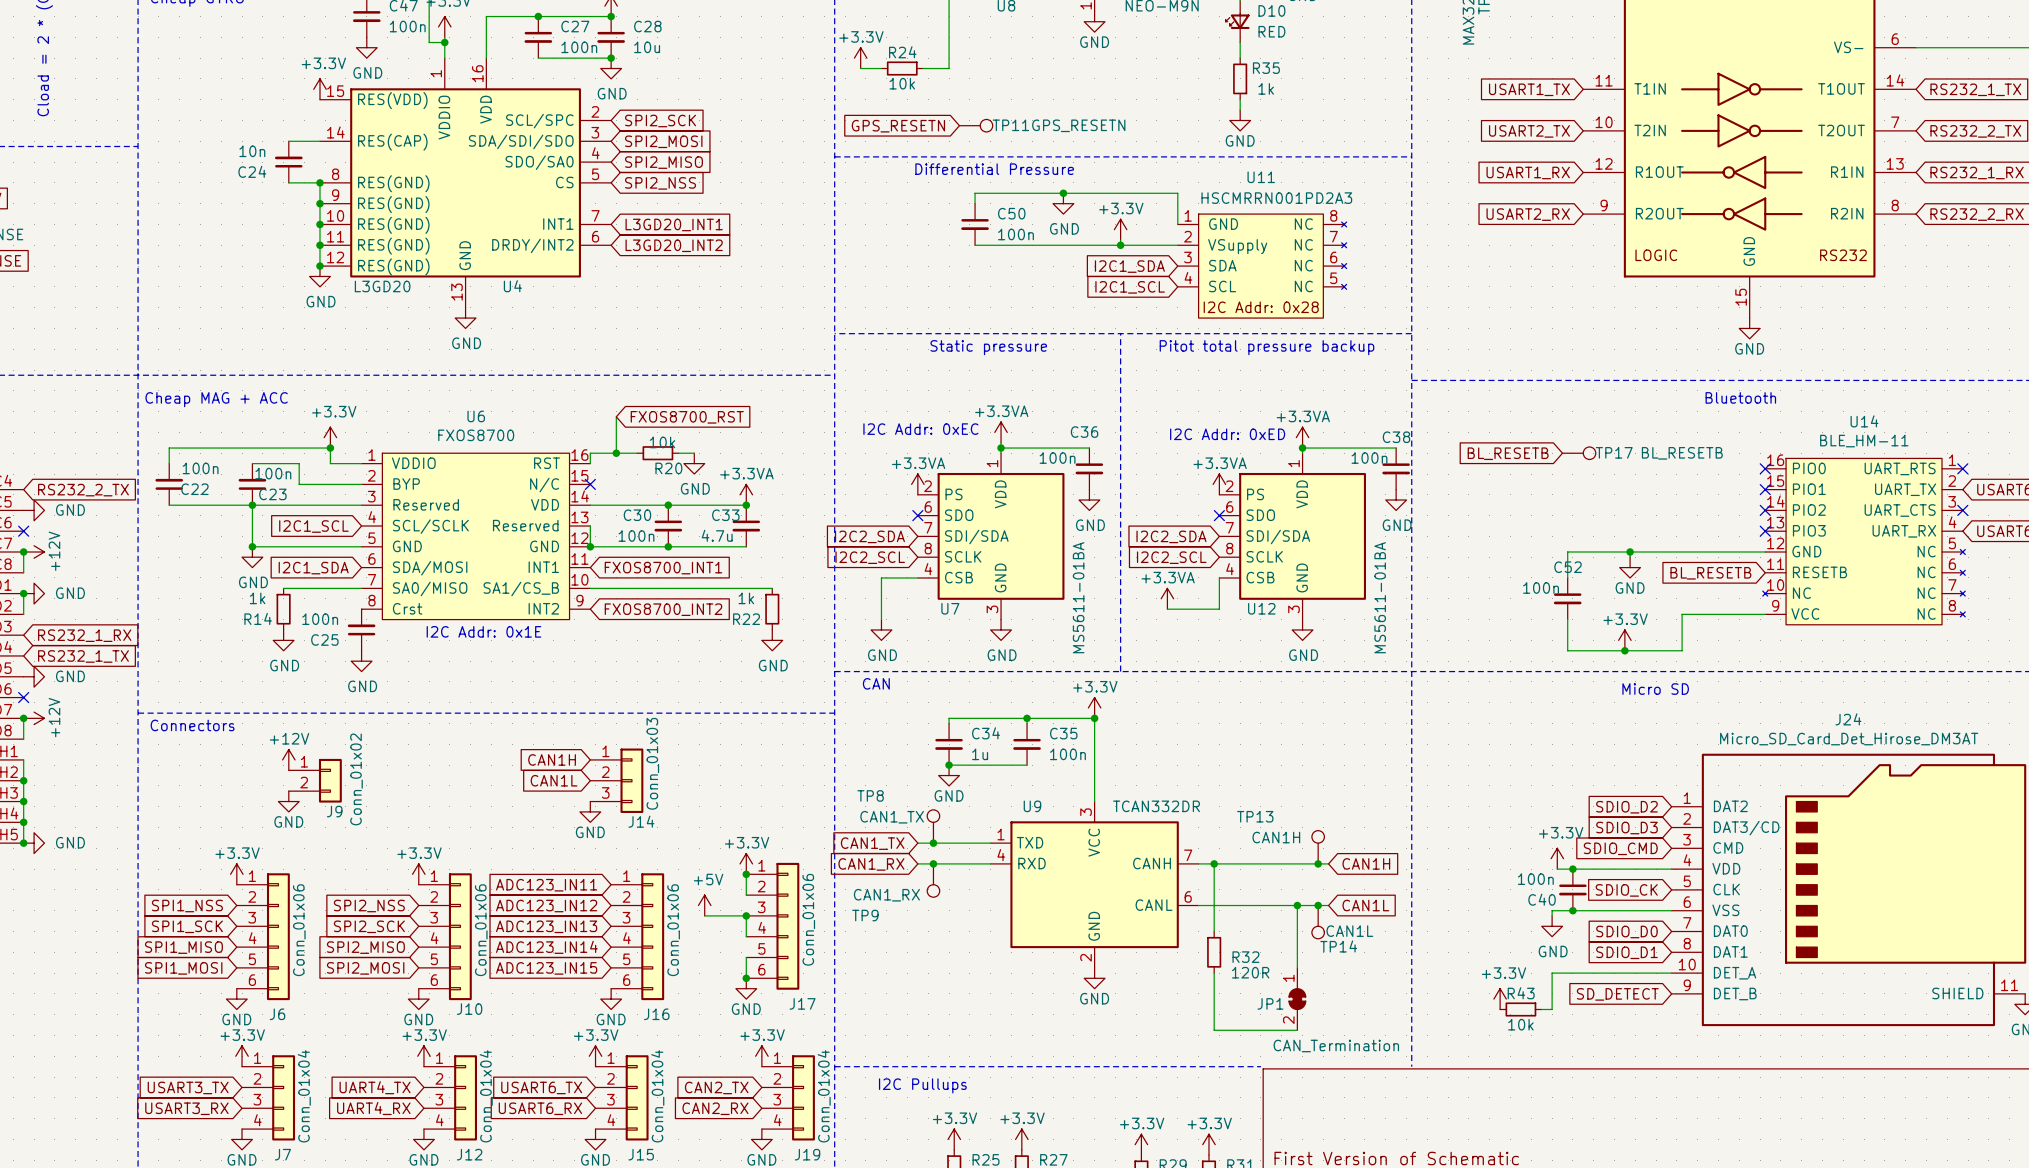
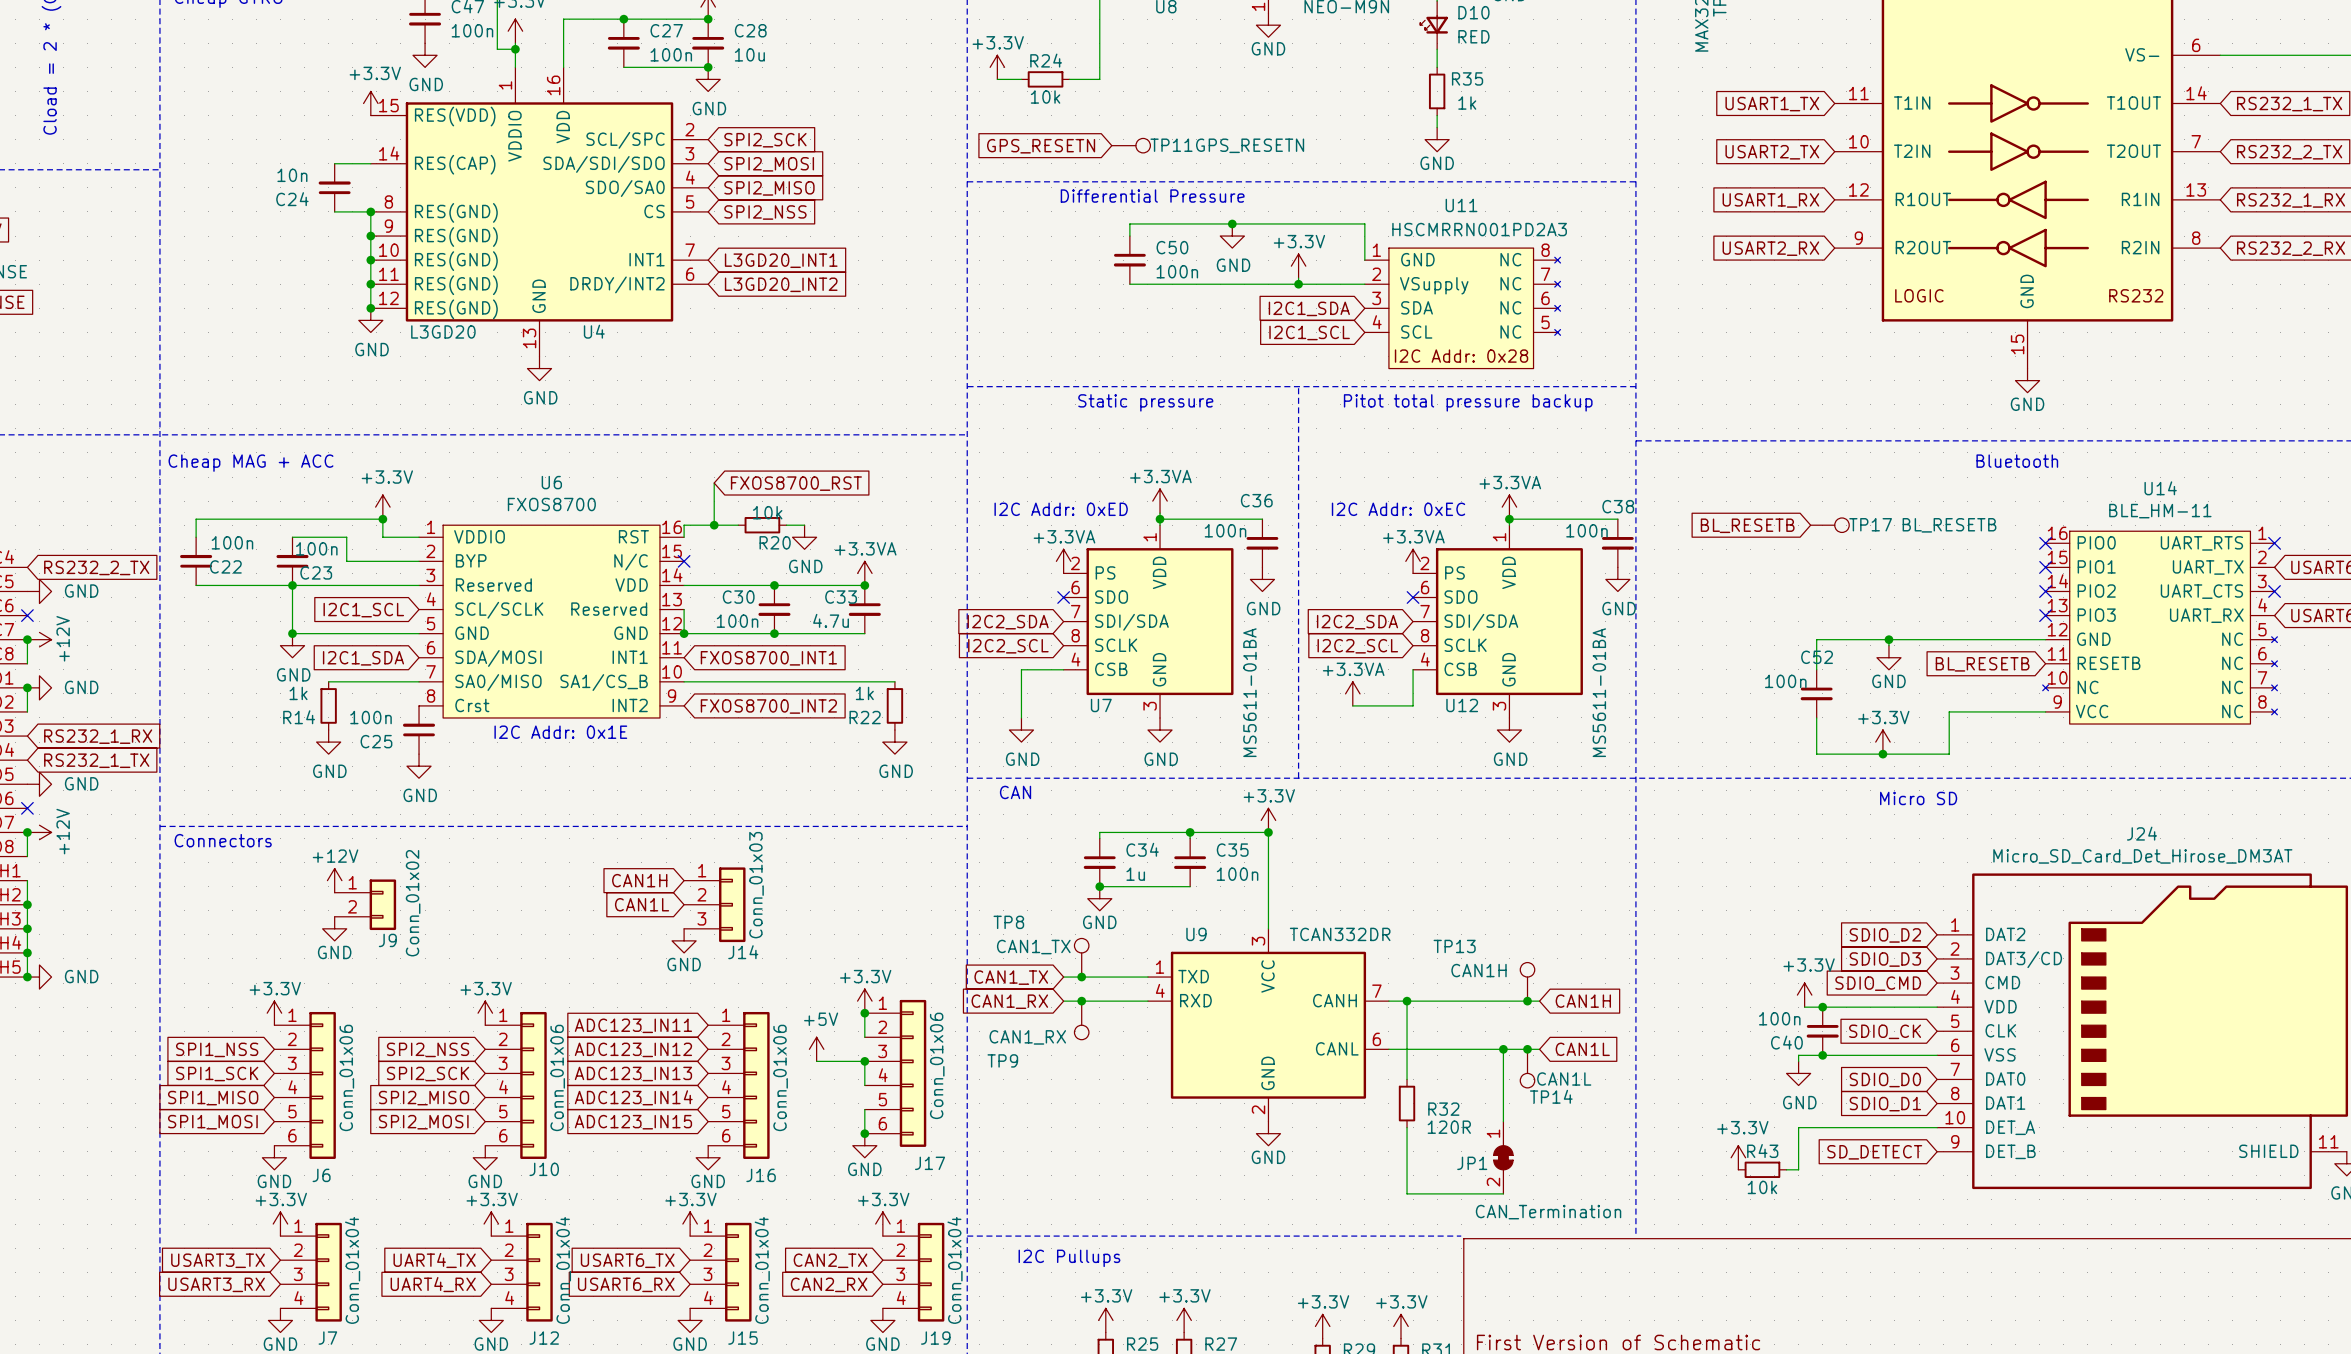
text: I2C Addr: 0xEC (920, 429) -> I2C Addr: 0xED (1061, 509)
text: I2C Addr: 0xED (1227, 434) -> I2C Addr: 0xEC (1398, 509)

